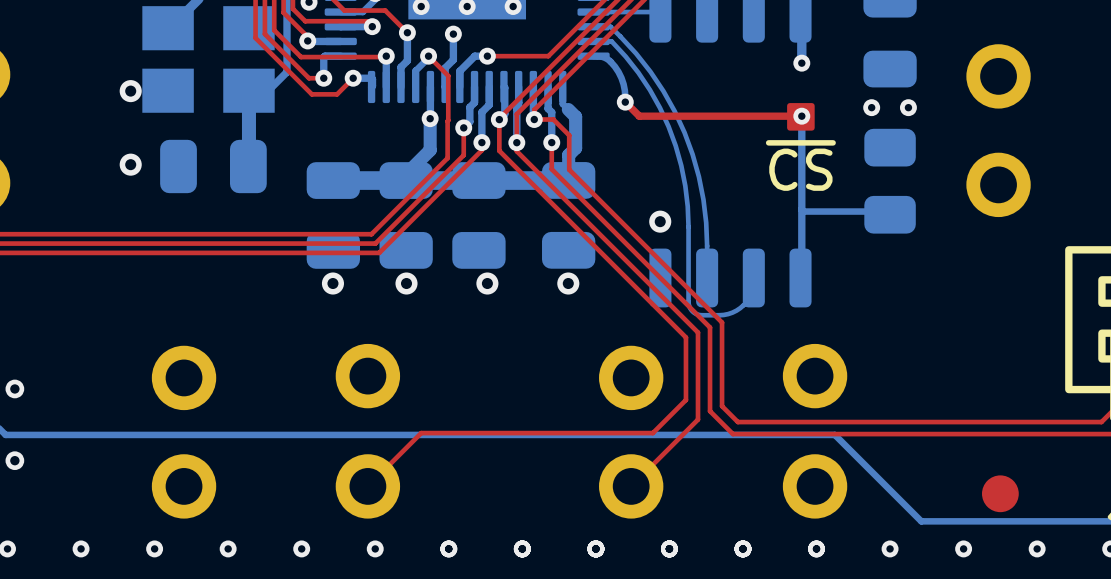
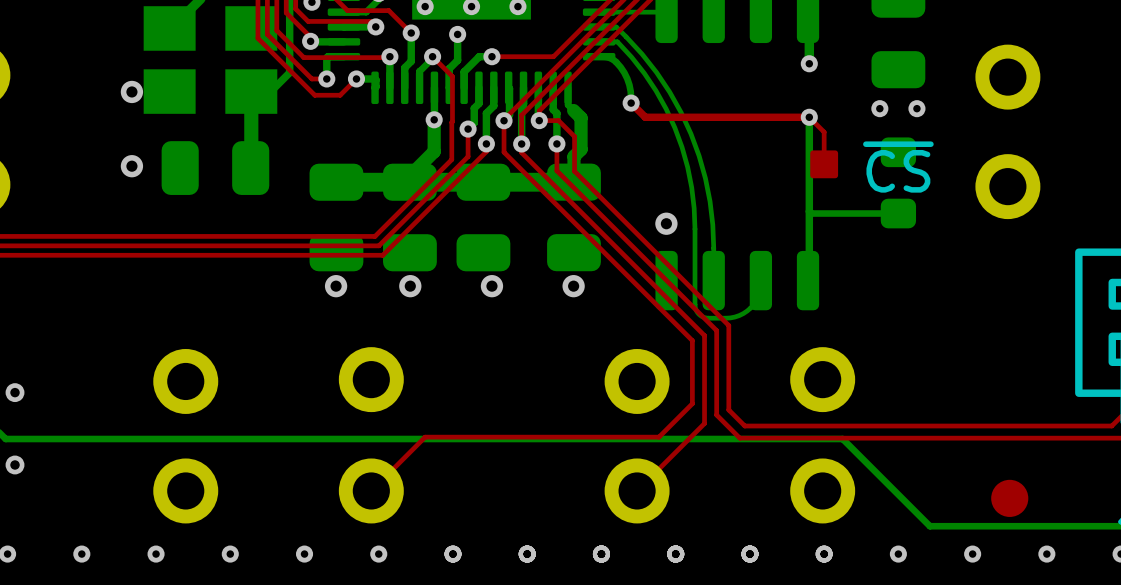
part position: (800, 116) -> (824, 164)
top track: none -> (809, 117) (824, 132) (824, 164)
part footprint: [864, 128, 916, 234] -> [880, 137, 917, 229]
part value position: ~{CS} (800, 165) -> ~{CS} (898, 167)

